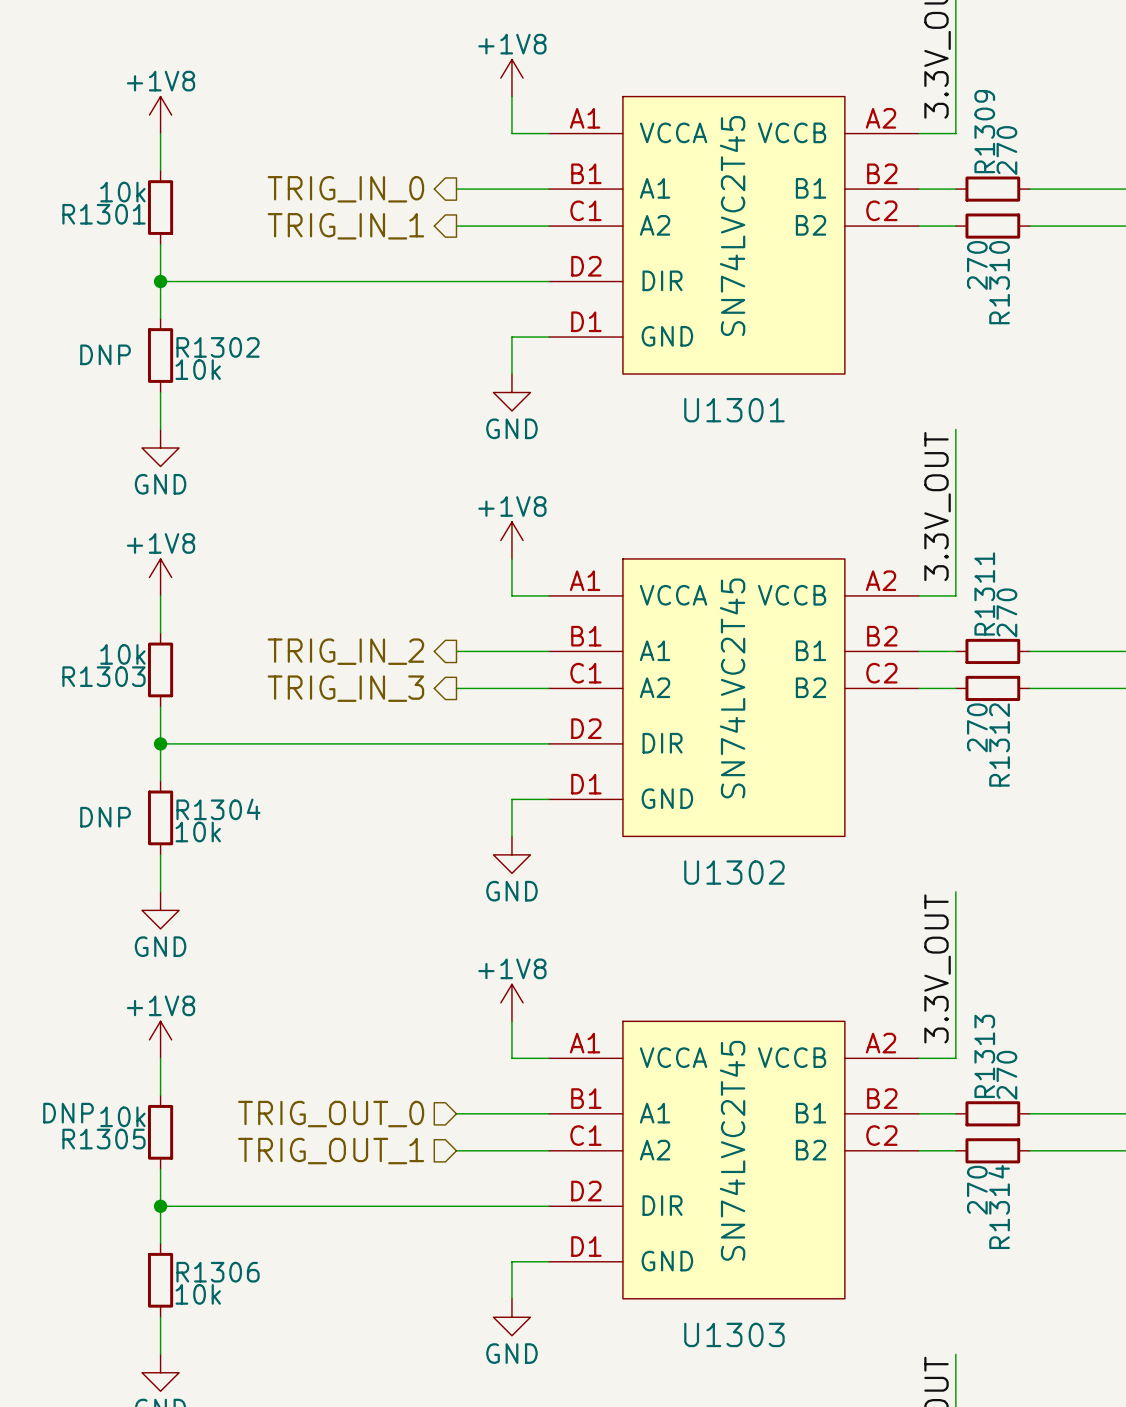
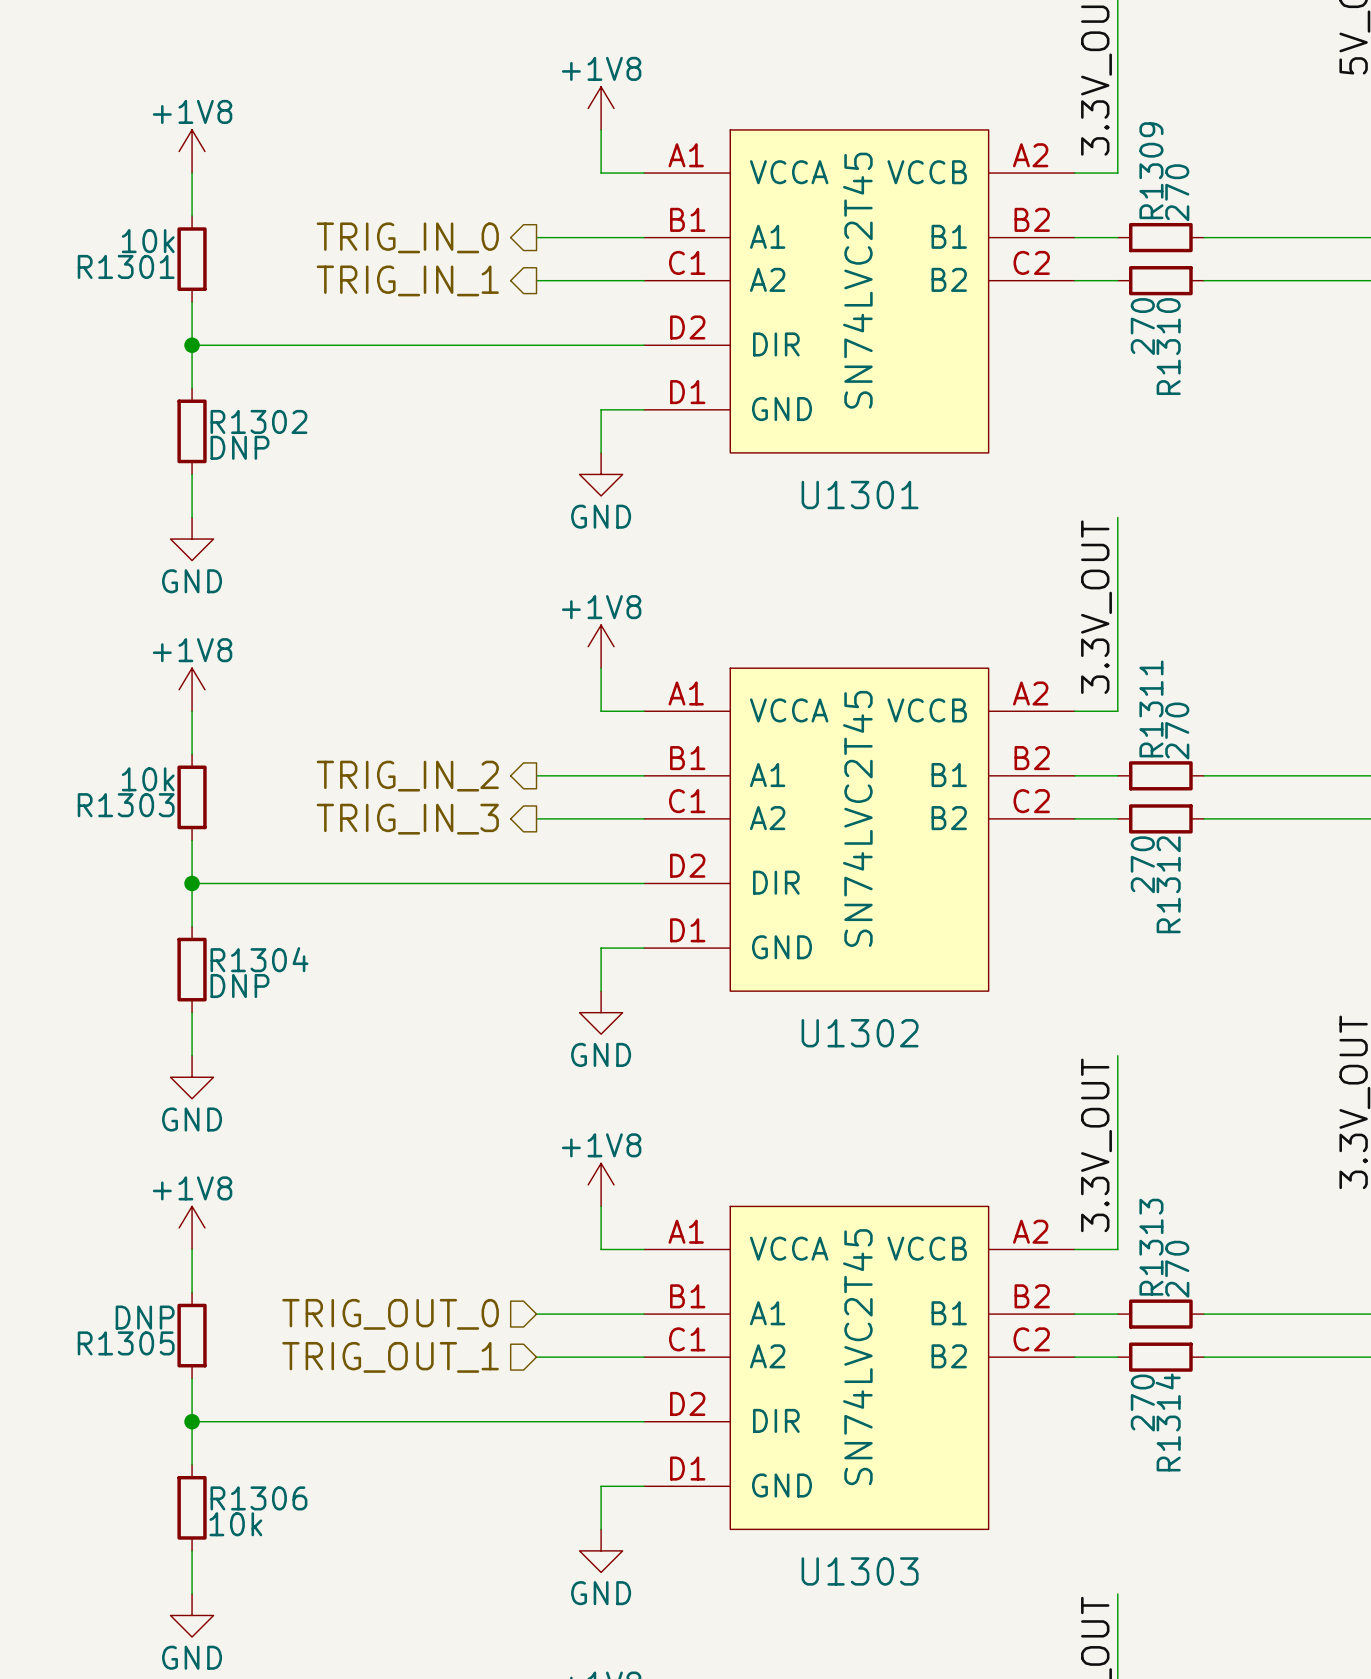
R1302 text: DNP (105, 354) -> none
R1302 value: 10k (198, 369) -> DNP (239, 447)
R1304 text: DNP (105, 817) -> none
R1304 value: 10k (198, 832) -> DNP (239, 986)
R1305 text: DNP (68, 1113) -> none
R1305 value: 10k (122, 1116) -> DNP (145, 1317)

